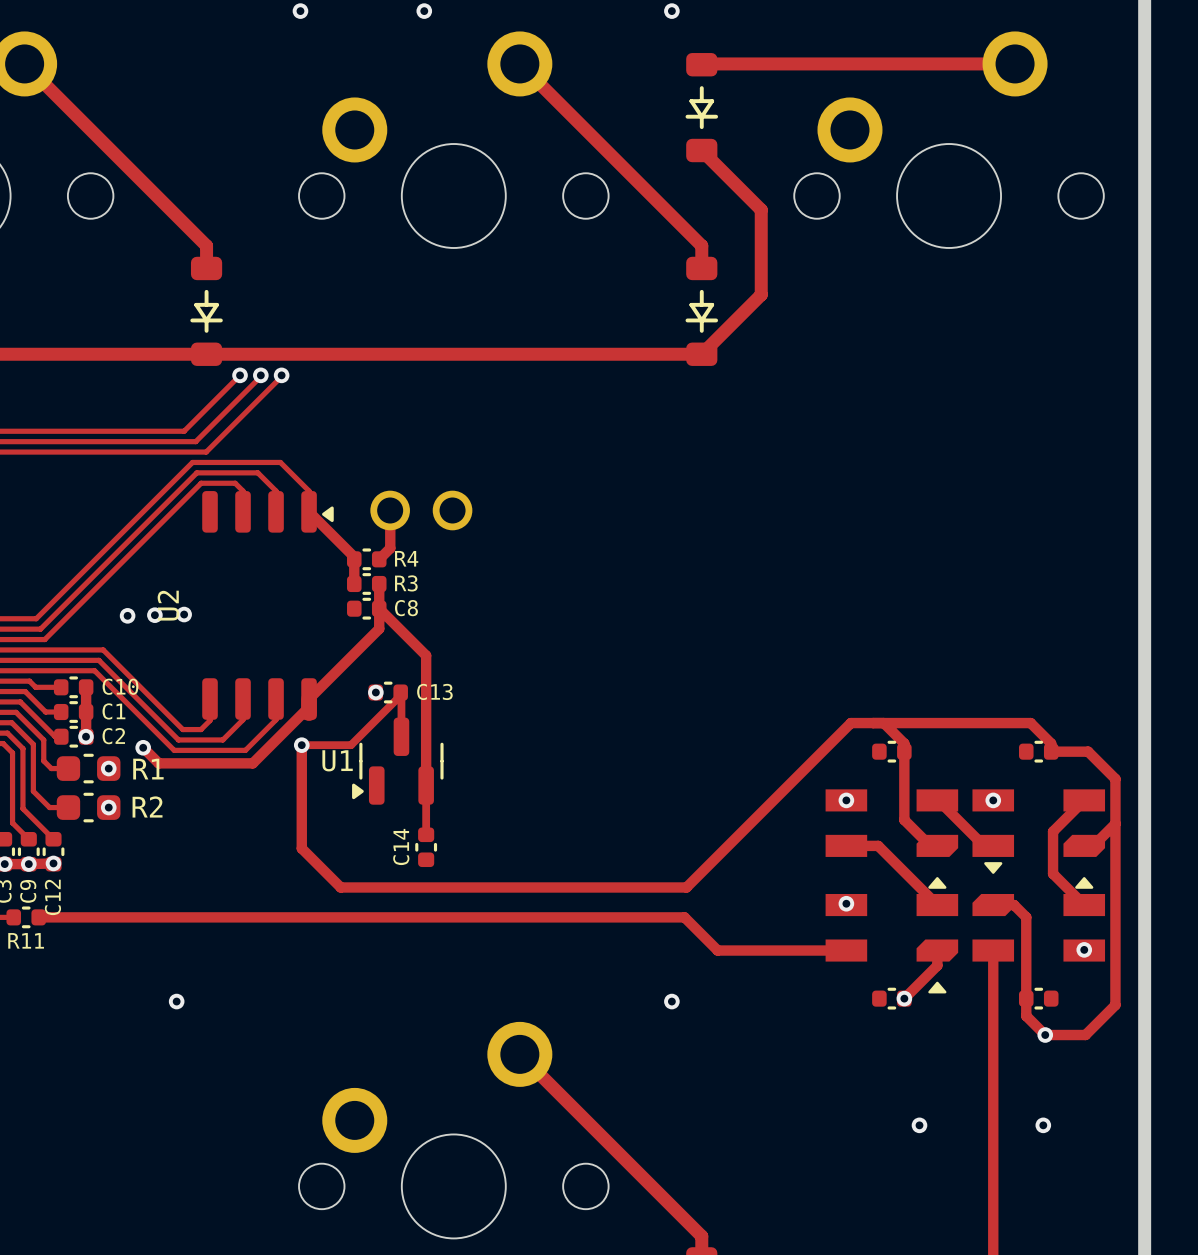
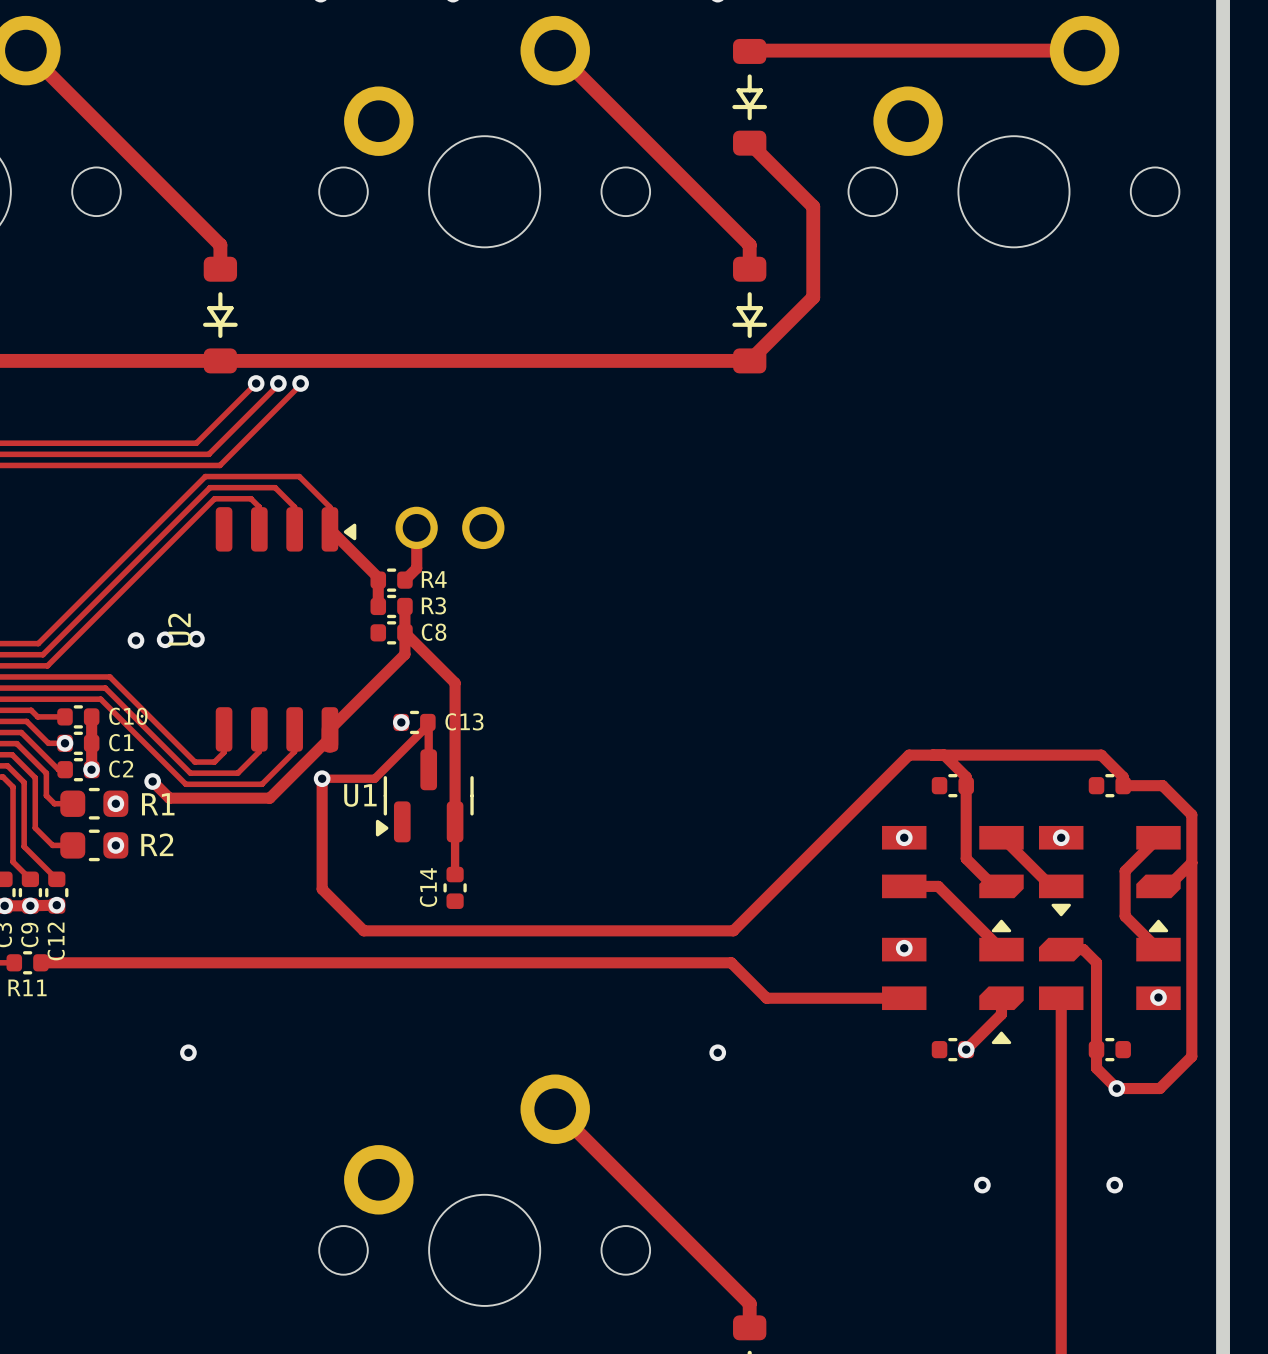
via: none -> (64, 743)

